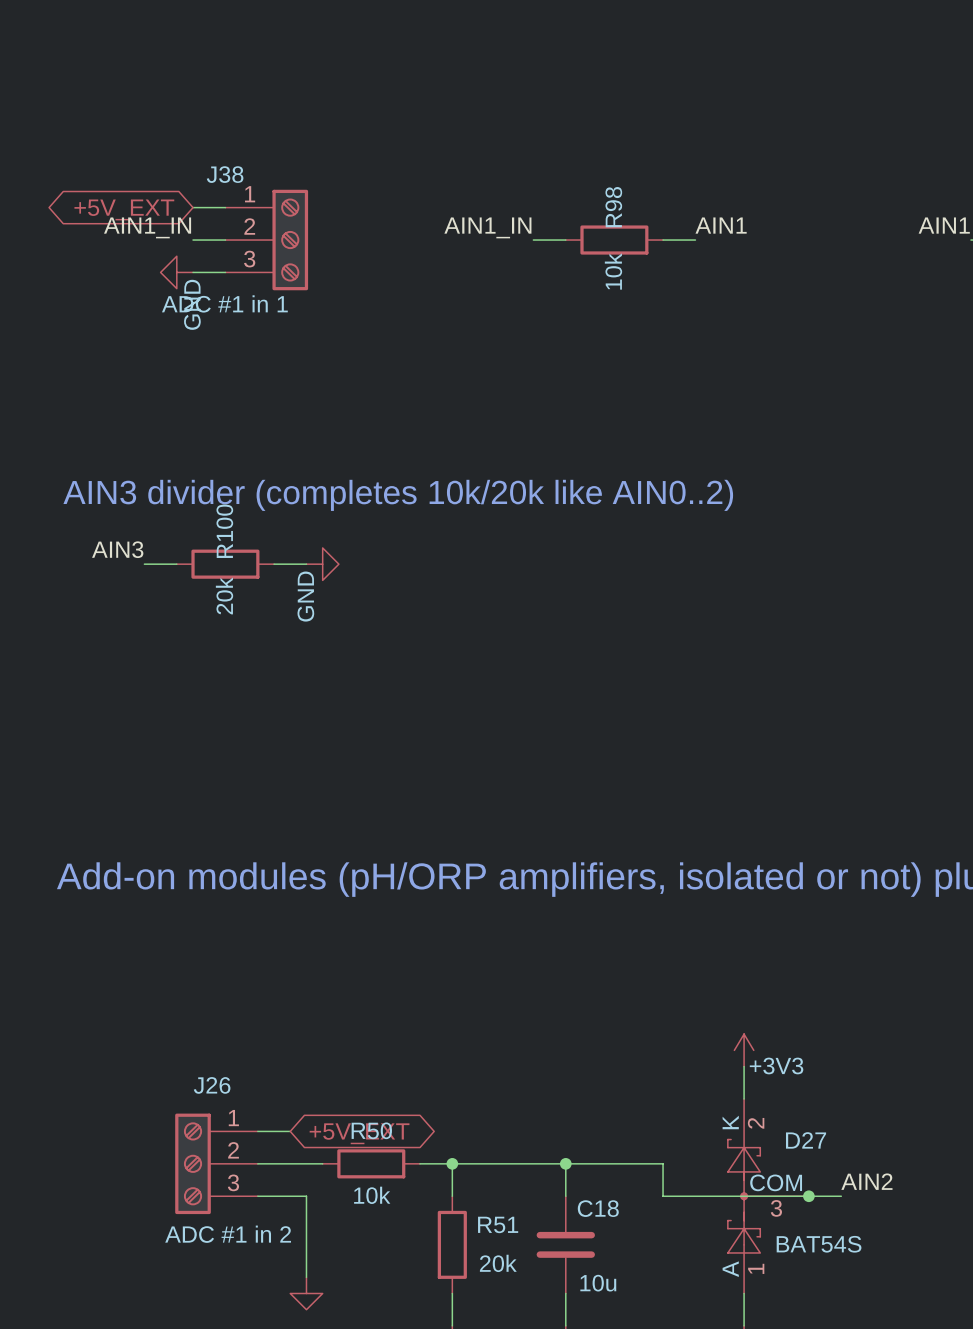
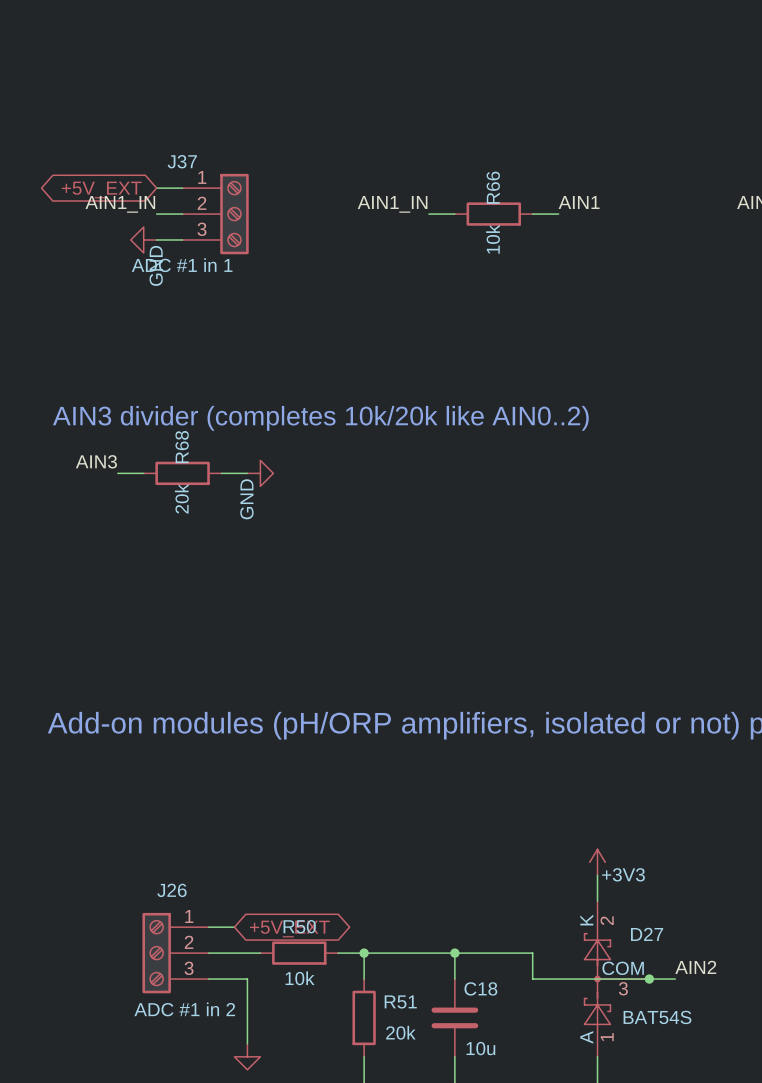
J38 name: J38 (225, 174) -> J37 (182, 161)
R98 name: R98 (613, 207) -> R66 (493, 187)
R100 name: R100 (224, 531) -> R68 (182, 447)

